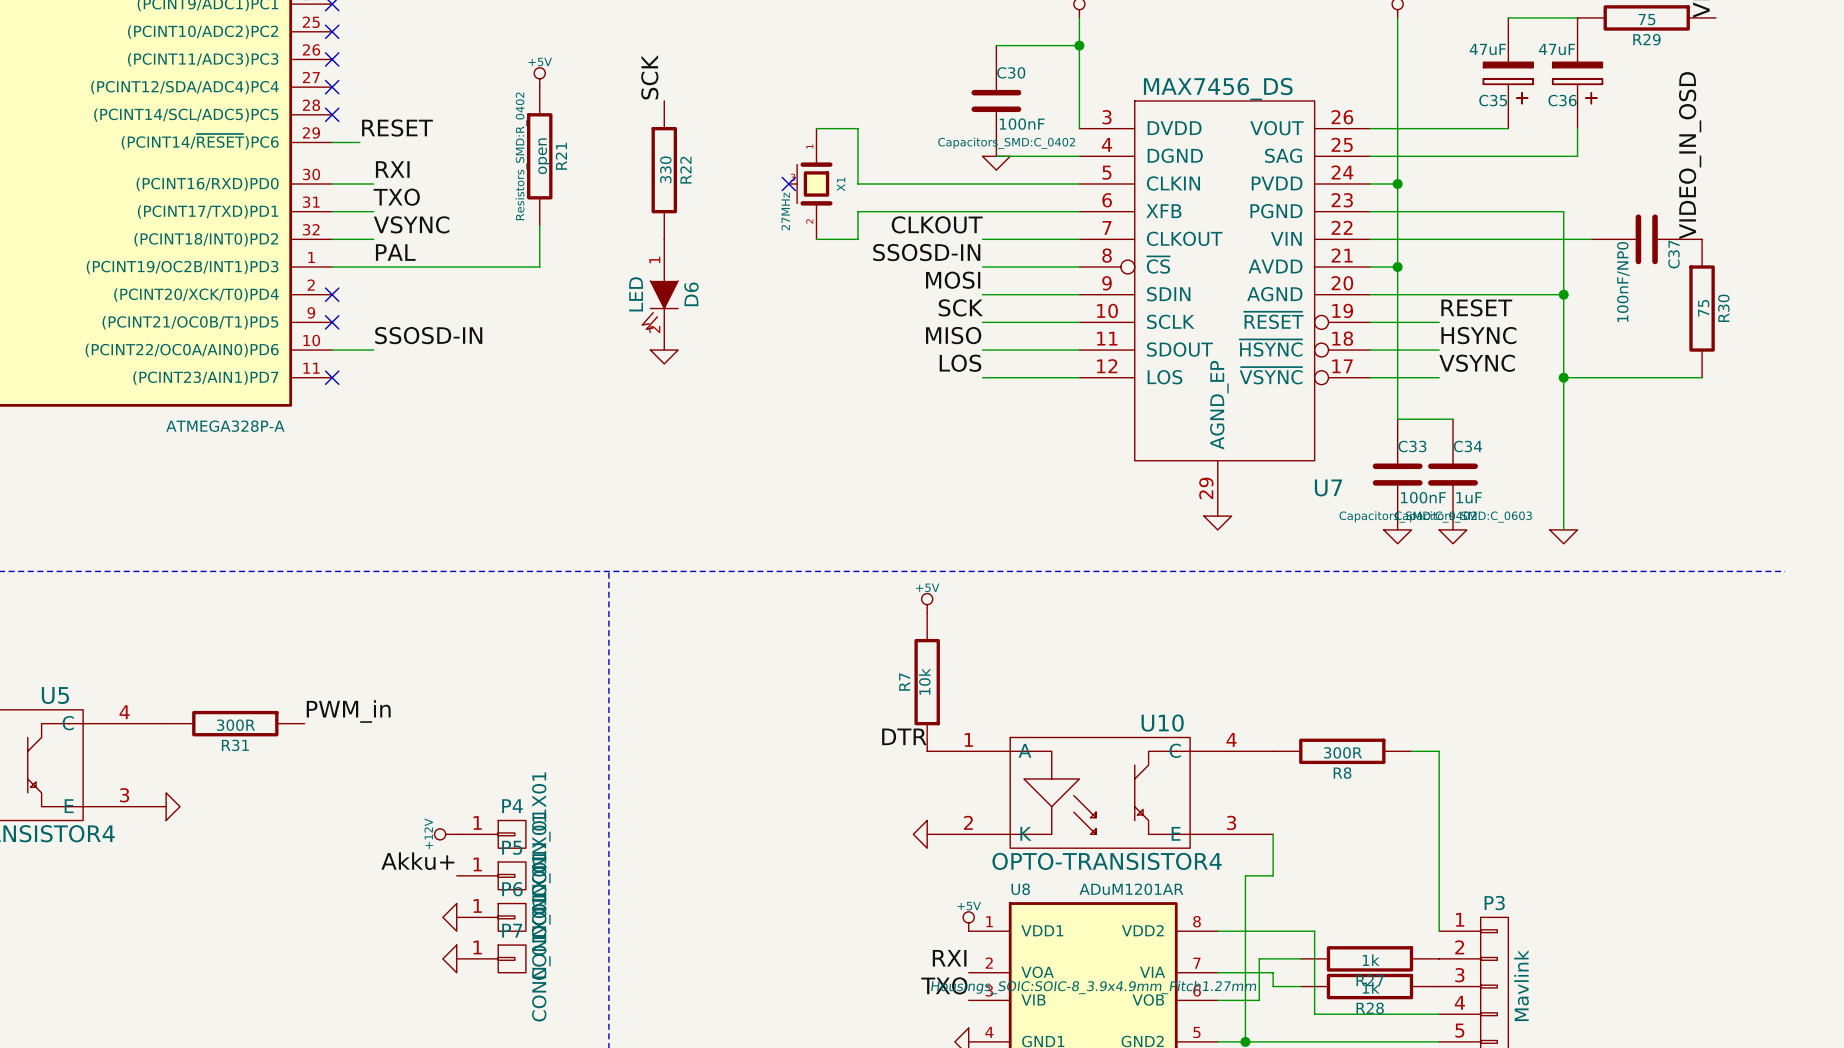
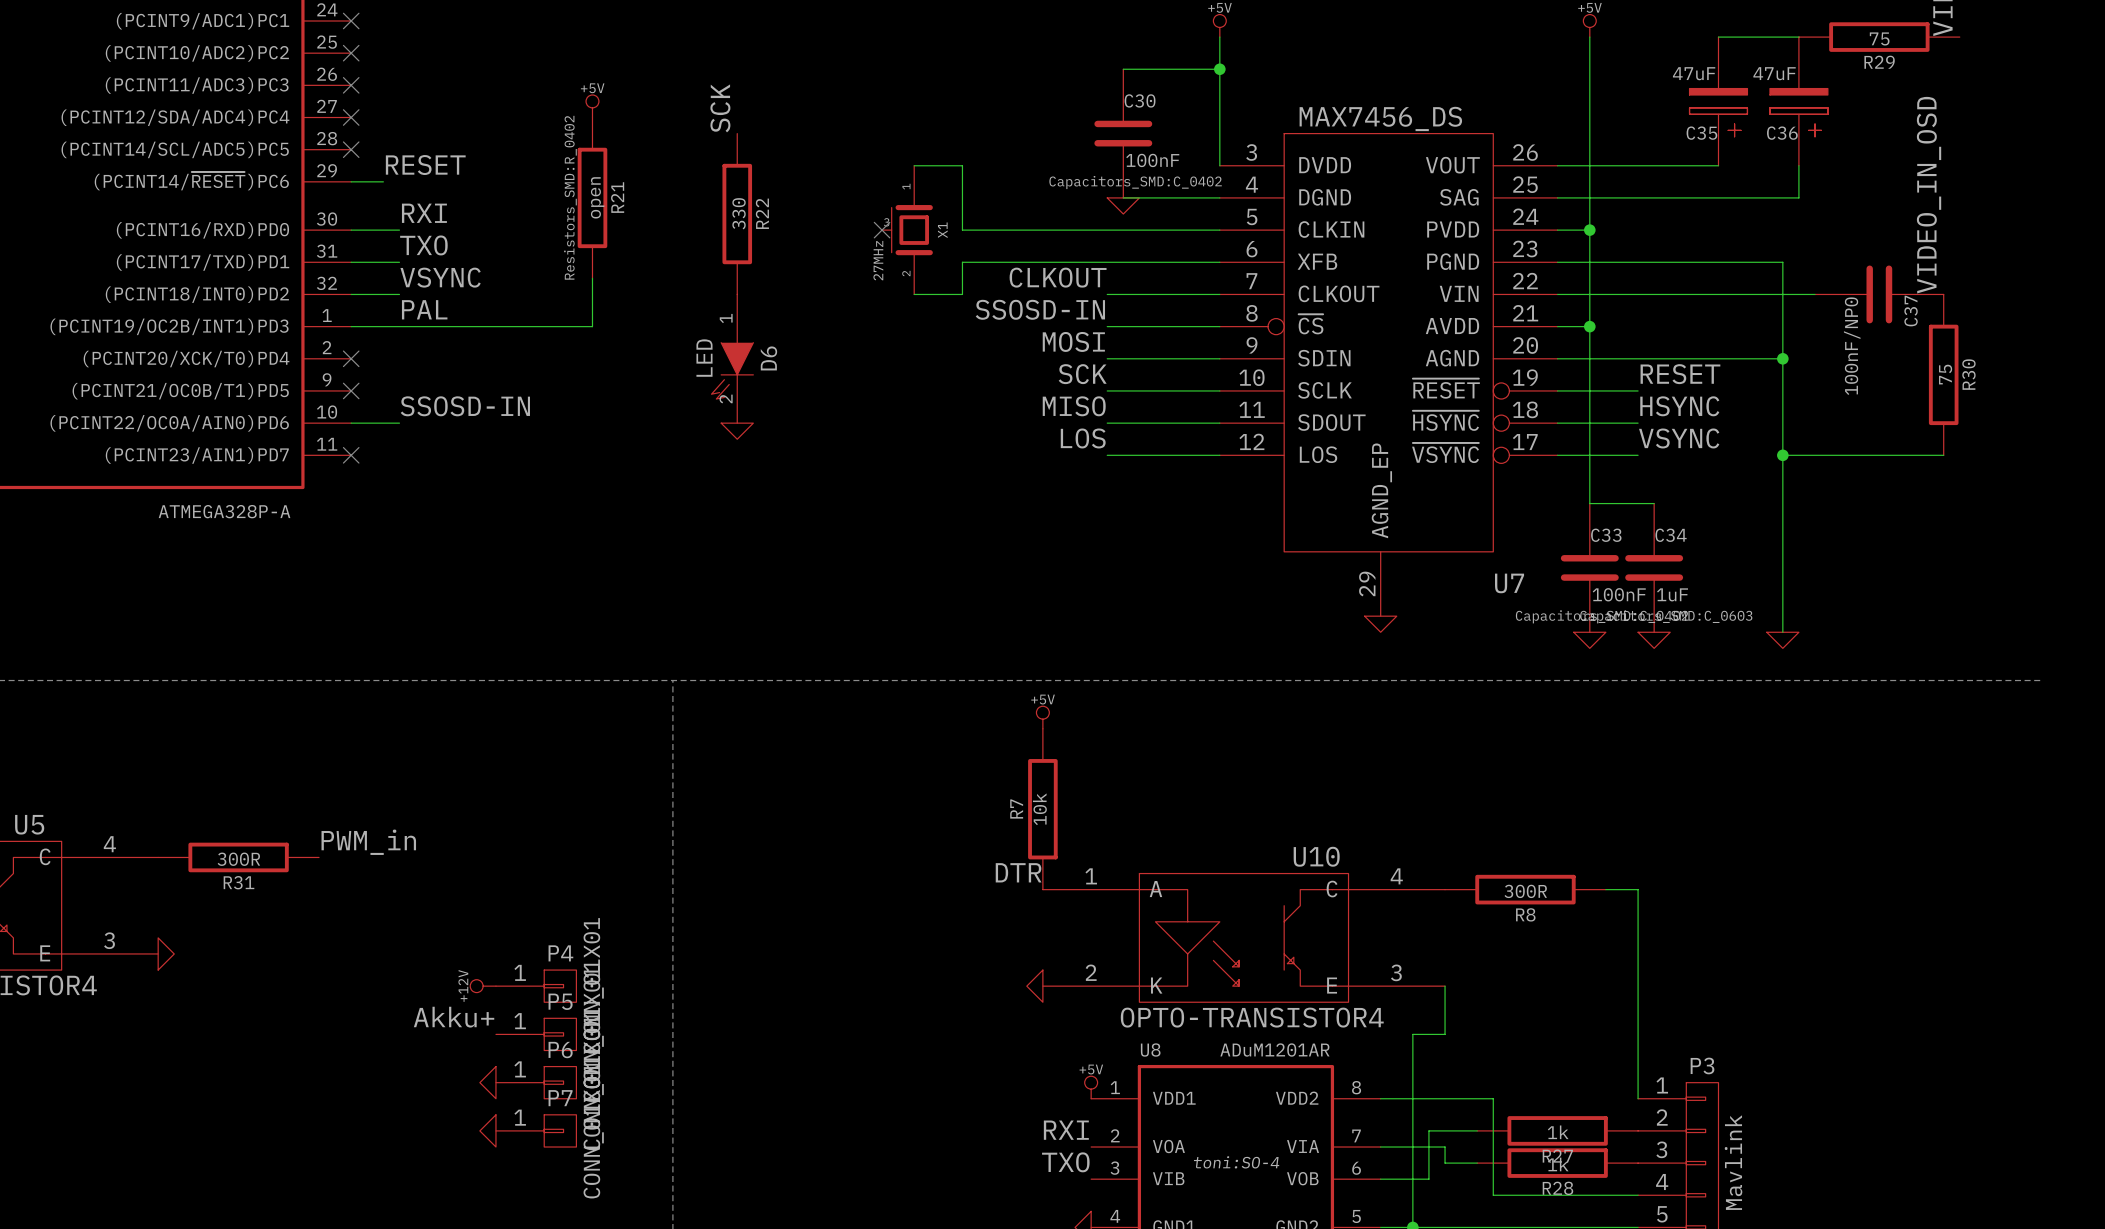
U8 text: Housings_SOIC:SOIC-8_3.9x4.9mm_Pitch1.27mm (1093, 987) -> toni:SO-4 (1236, 1162)

